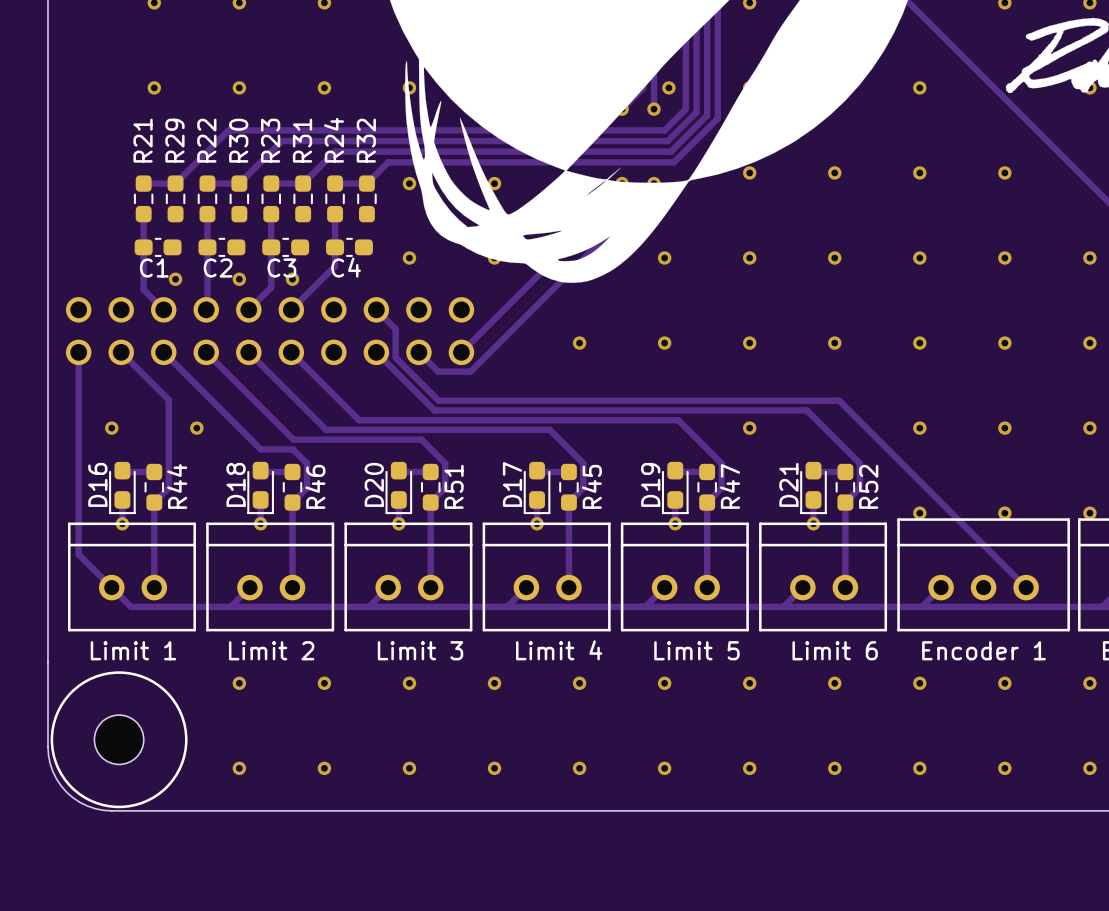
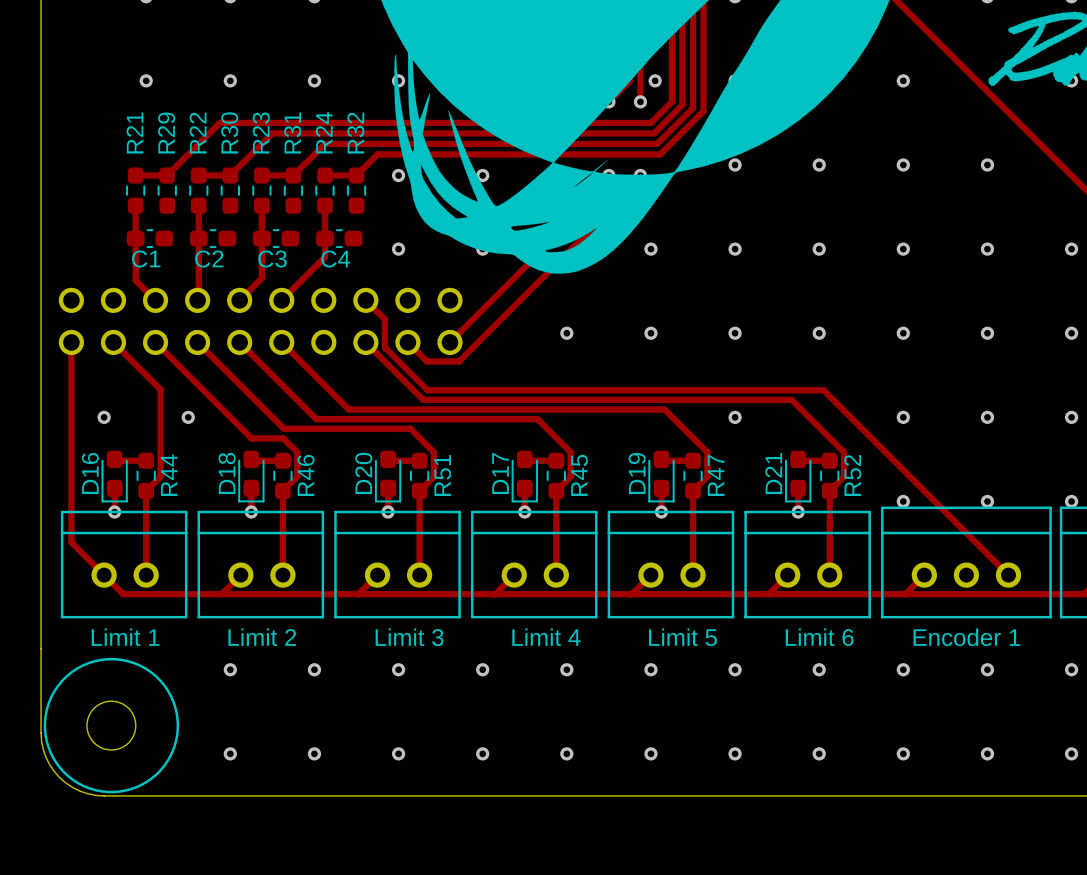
via: (175, 279) -> none
via: (239, 279) -> none
via: (292, 279) -> none

